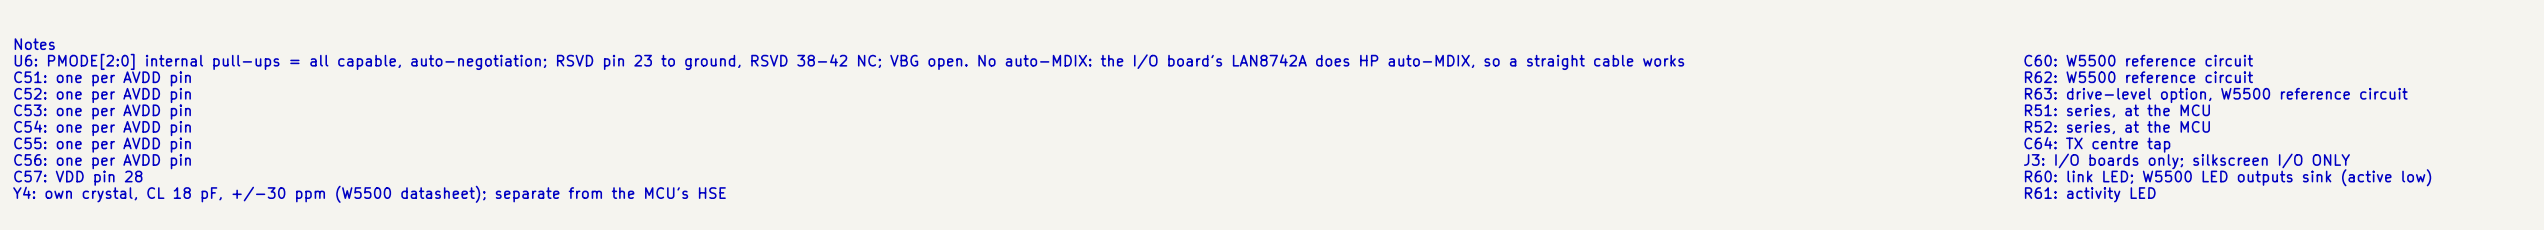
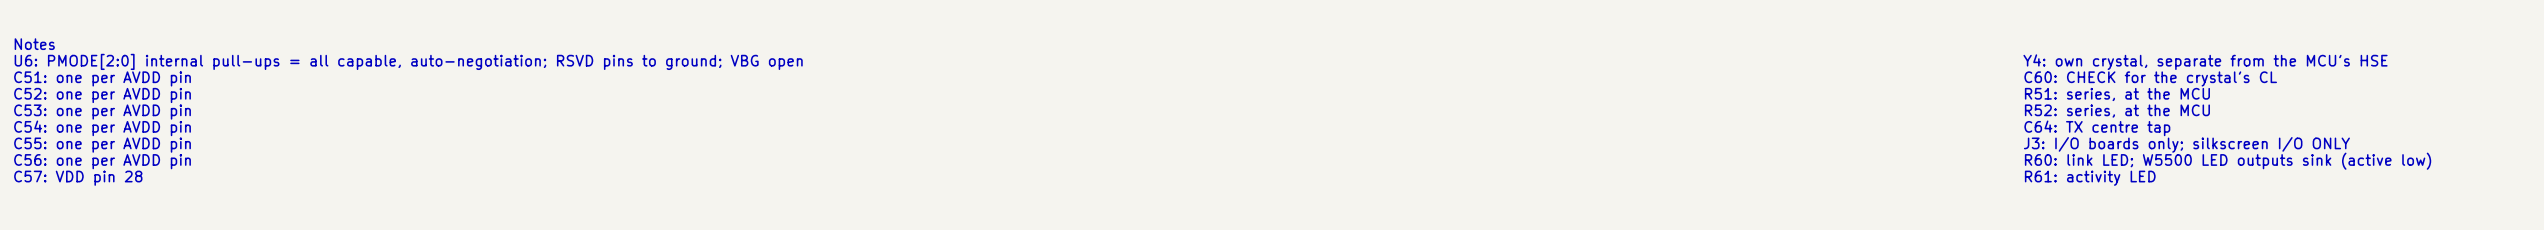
text: C60: W5500 reference circuit (2138, 60) -> Y4: own crystal, separate from the MCU's HSE (2205, 62)
text: U6: PMODE[2:0] internal pull-ups = all capable, auto-negotiation; RSVD pin 23 to ground, RSVD 38-42 NC; VBG open. No auto-MDIX: the I/O board's LAN8742A does HP auto-MDIX, so a straight cable works (849, 61) -> U6: PMODE[2:0] internal pull-ups = all capable, auto-negotiation; RSVD pins to ground; VBG open (408, 61)
text: R62: W5500 reference circuit (2138, 77) -> C60: CHECK for the crystal's CL (2150, 78)
text: R63: drive-level option, W5500 reference circuit (2216, 95) -> R51: series, at the MCU (2117, 94)
text: R51: series, at the MCU (2117, 111) -> R52: series, at the MCU (2117, 111)
text: R52: series, at the MCU (2117, 127) -> C64: TX centre tap (2097, 128)
text: C64: TX centre tap (2097, 144) -> J3: I/O boards only; silkscreen I/O ONLY (2186, 144)
text: J3: I/O boards only; silkscreen I/O ONLY (2186, 161) -> R60: link LED; W5500 LED outputs sink (active low) (2228, 161)
text: R60: link LED; W5500 LED outputs sink (active low) (2228, 177) -> R61: activity LED (2090, 178)
text: Y4: own crystal, CL 18 pF, +/-30 ppm (W5500 datasheet); separate from the MCU's HSE (369, 194) -> none
text: R61: activity LED (2090, 194) -> none

